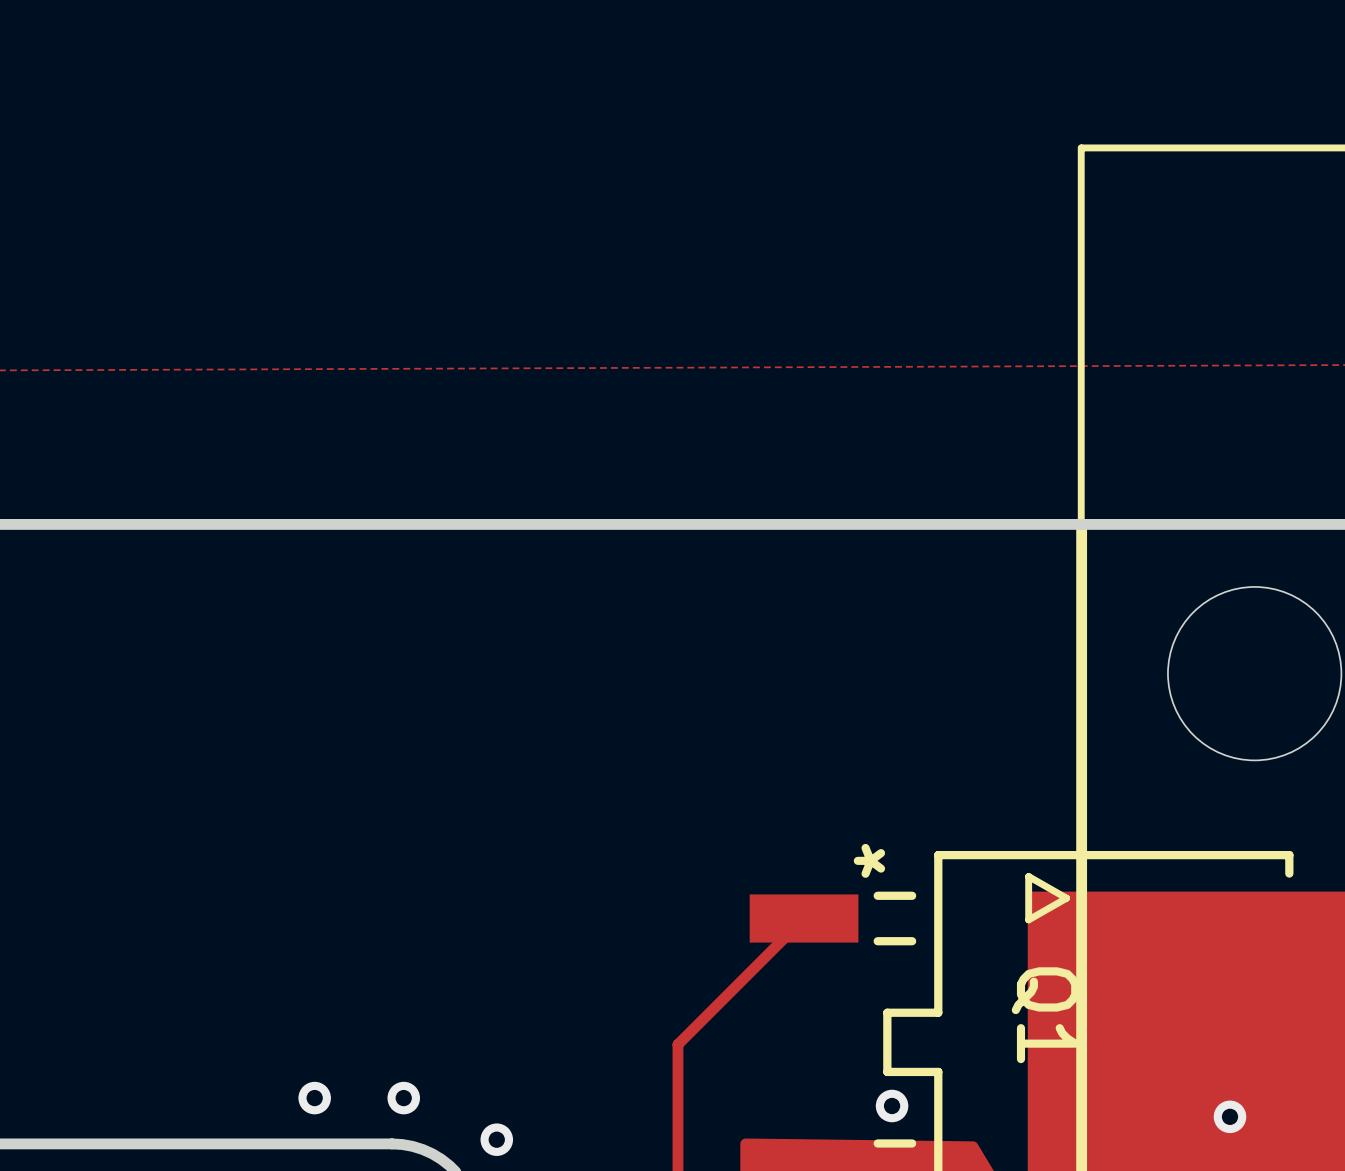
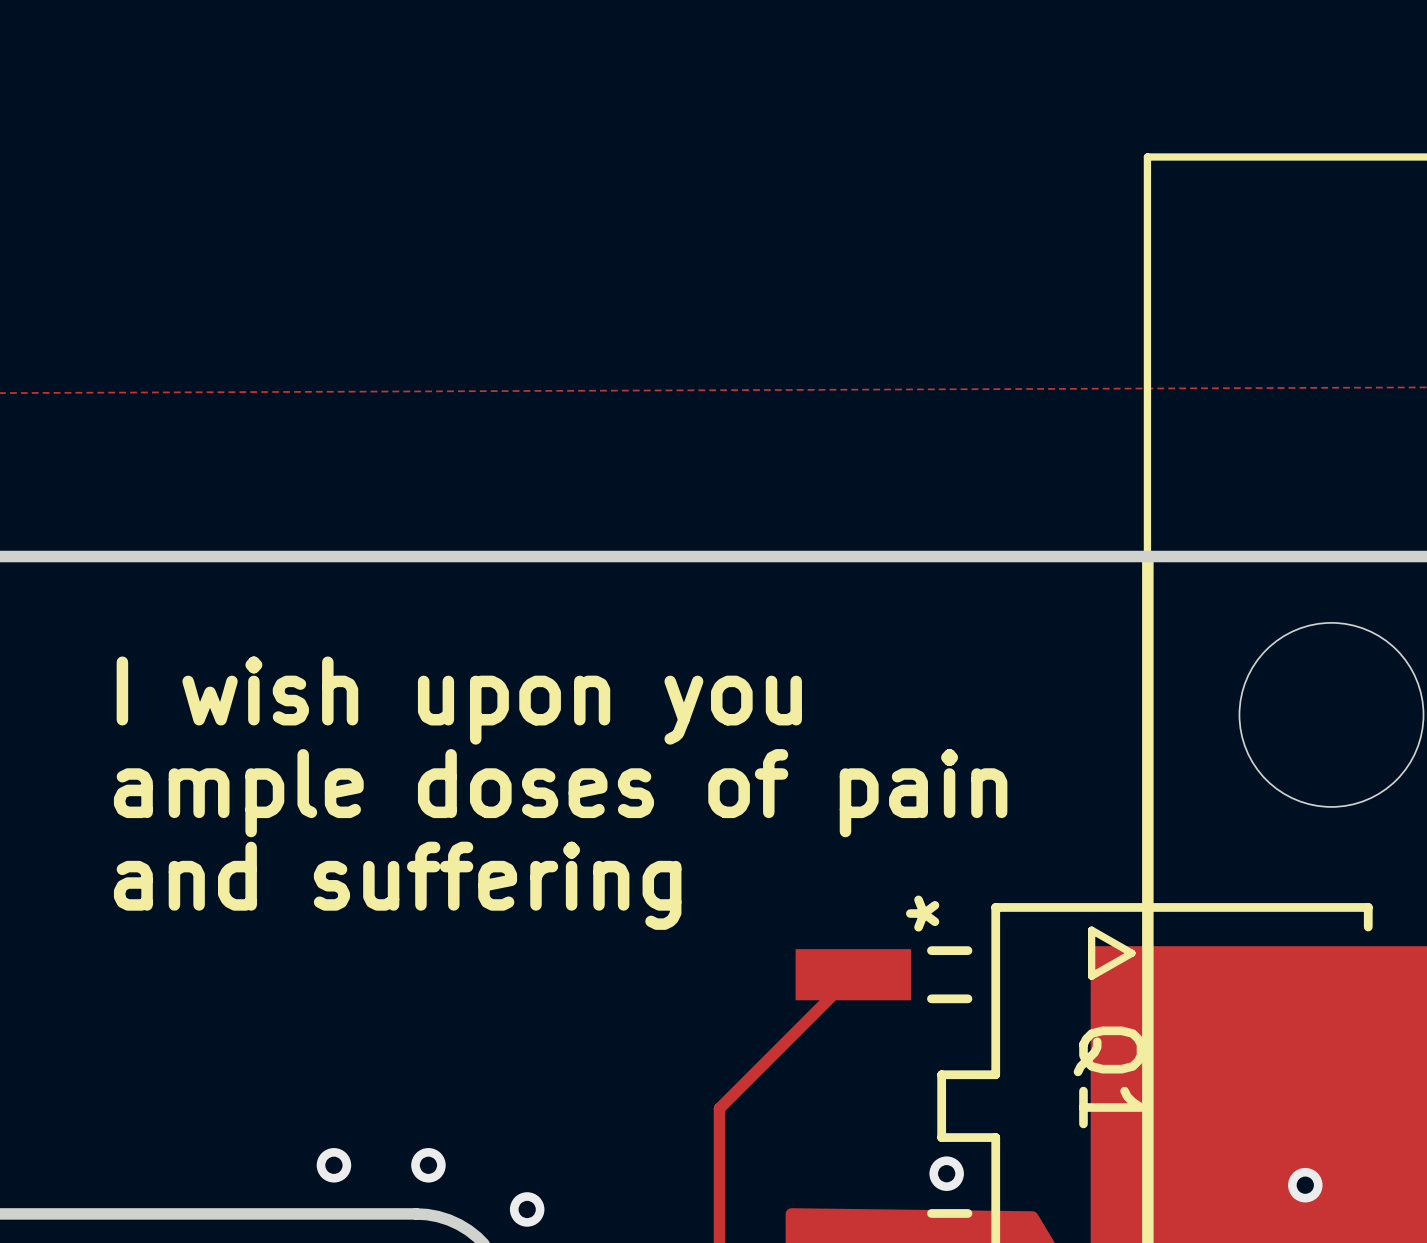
text: none -> I wish upon you (459, 700)
text: none -> ample doses of pain (560, 793)
text: none -> and suffering (397, 885)

